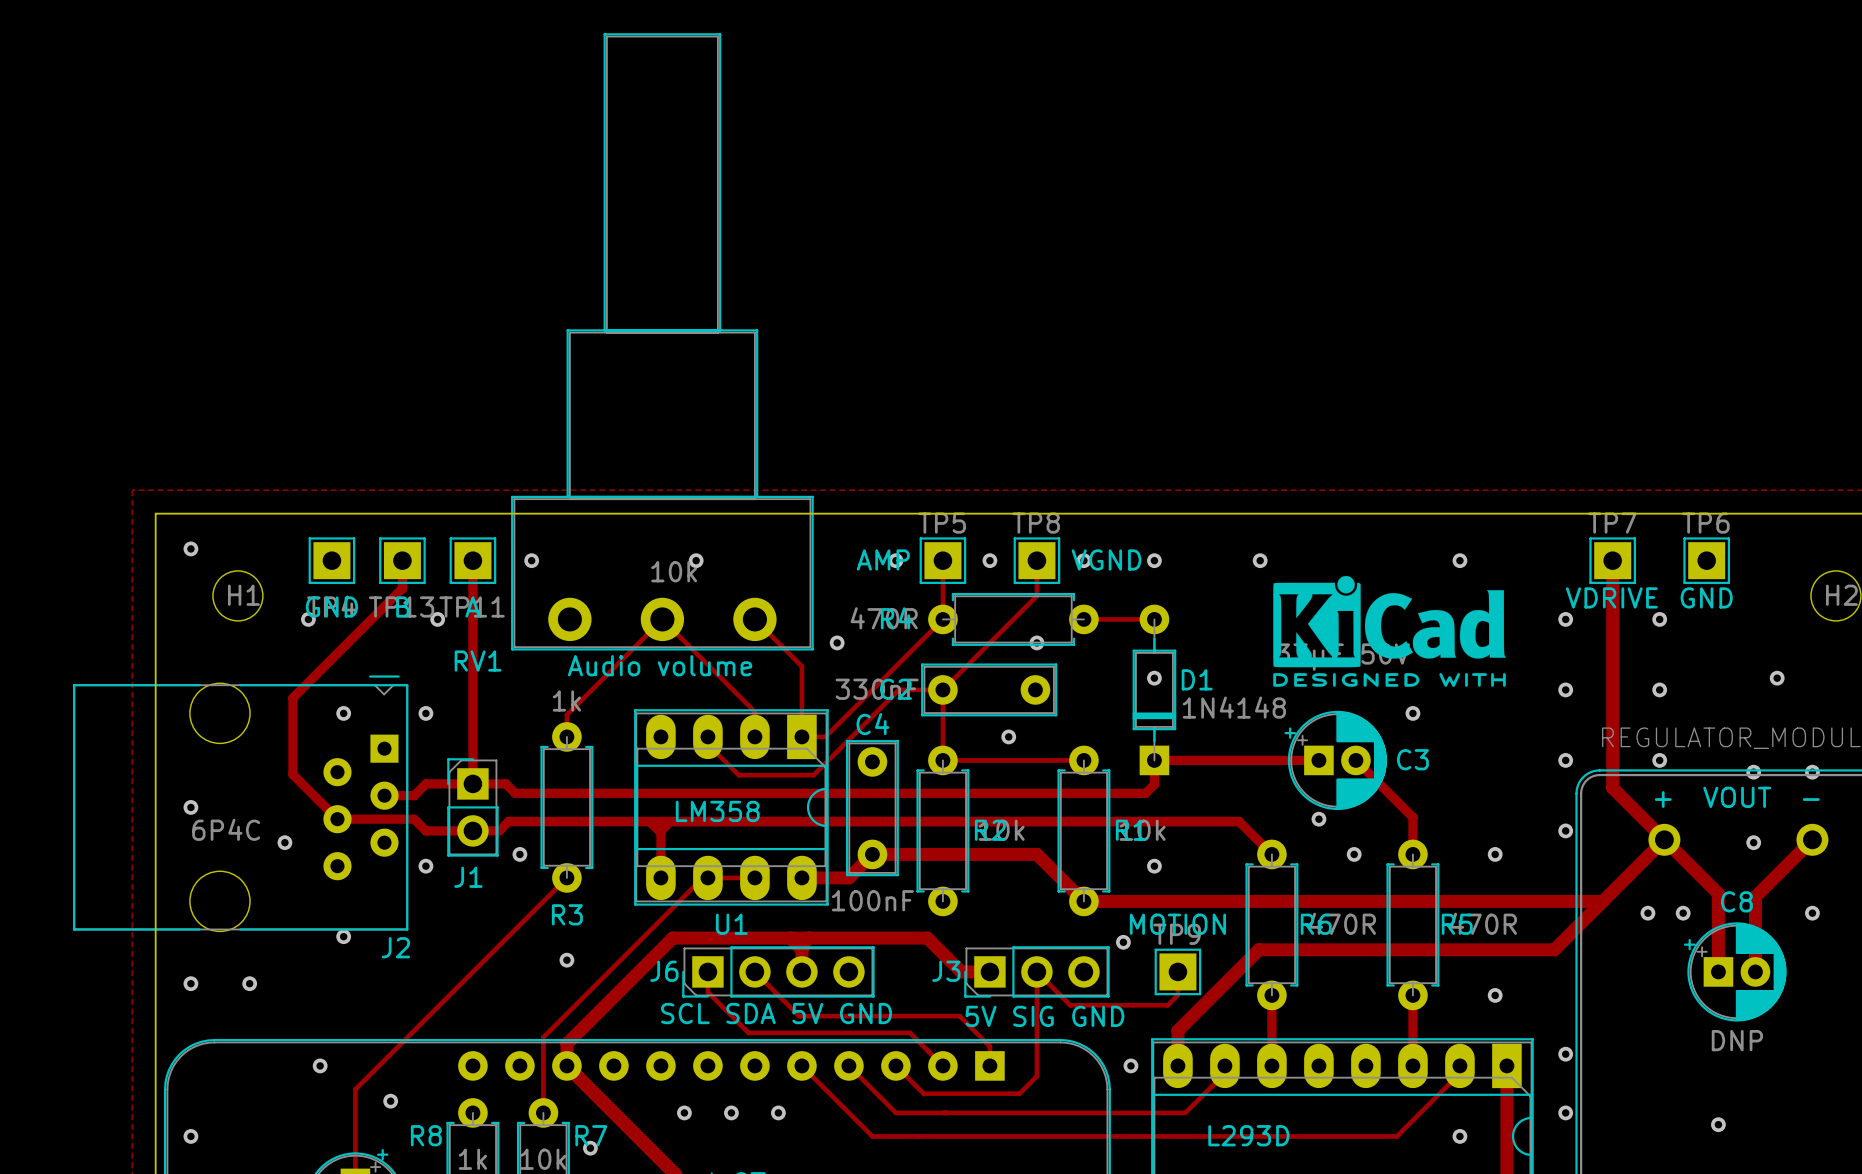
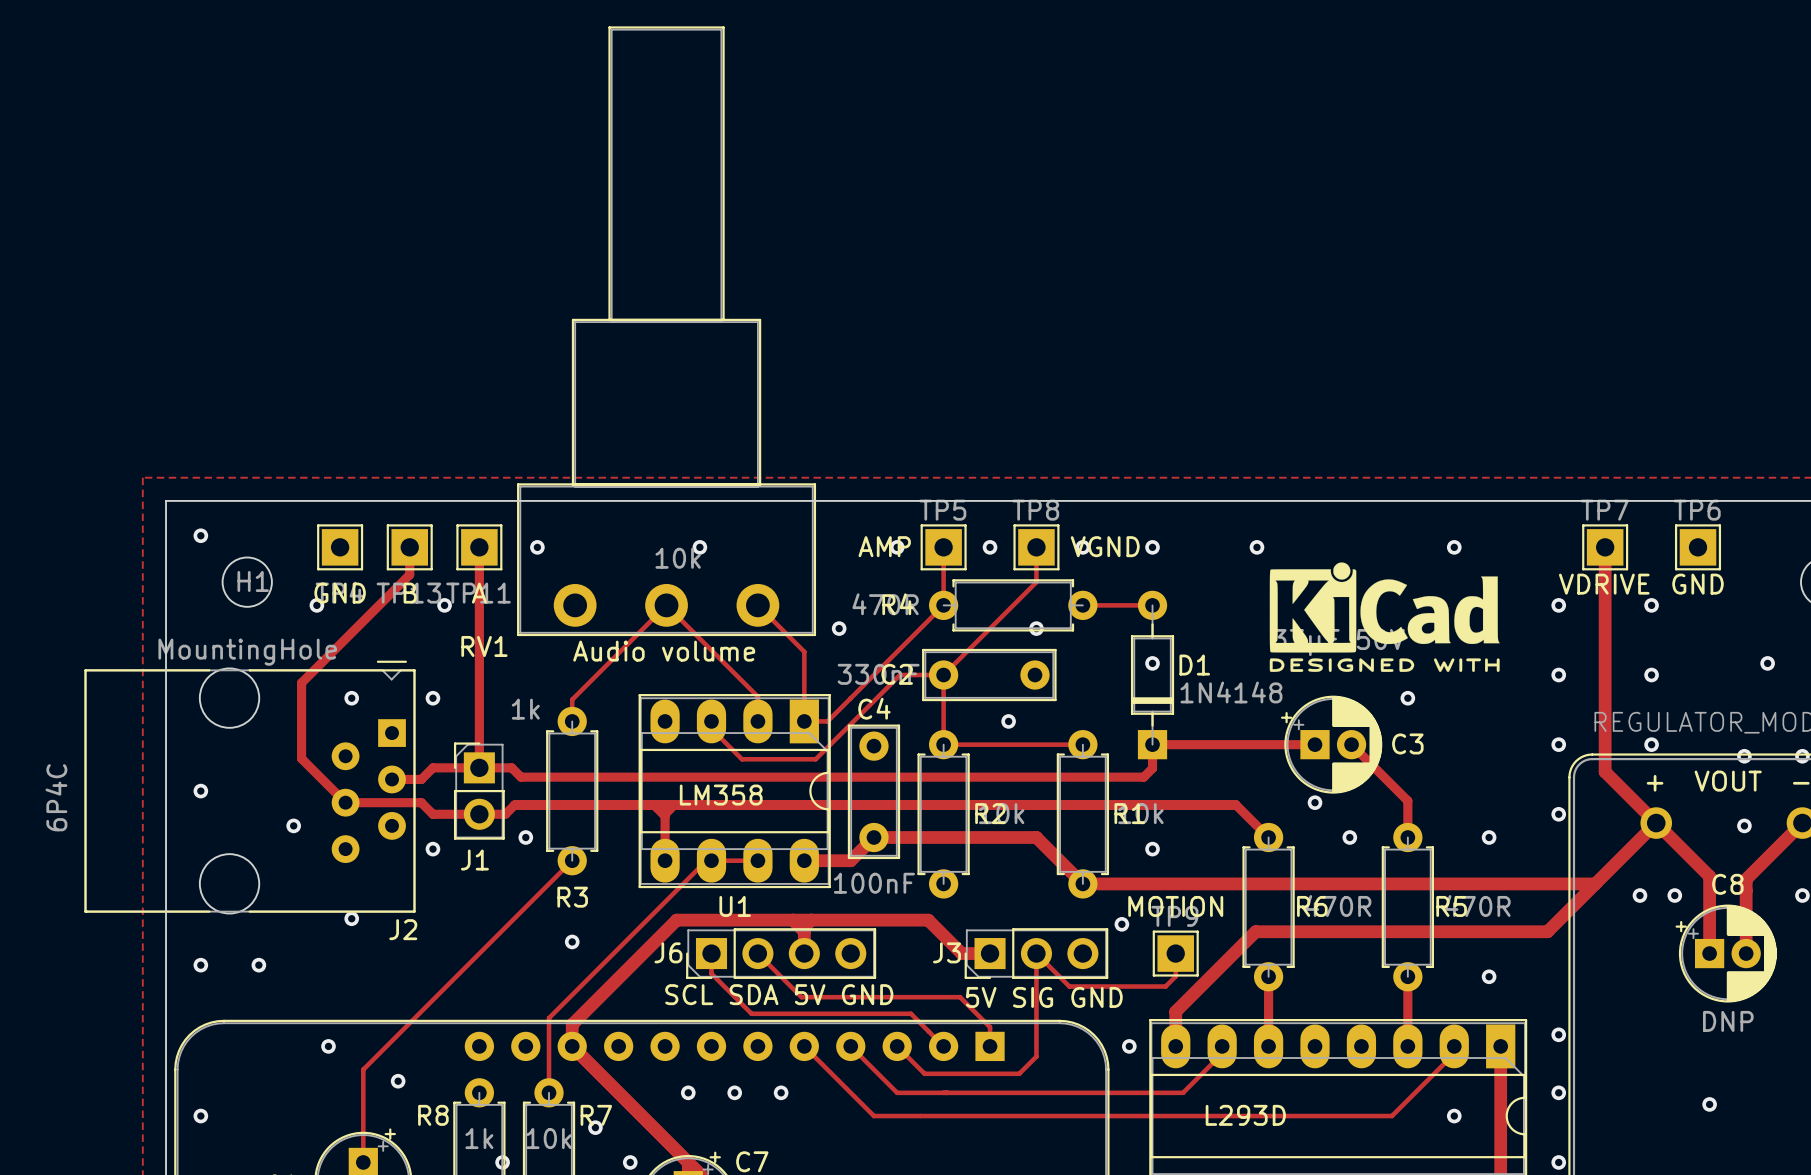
H1 value: none -> MountingHole (247, 652)
R3 value position: 1k (566, 700) -> 1k (525, 709)
J2 value rotation: 0° (226, 829) -> 90° counterclockwise (56, 797)
J2 value position: 6P4C (226, 829) -> 6P4C (56, 797)

